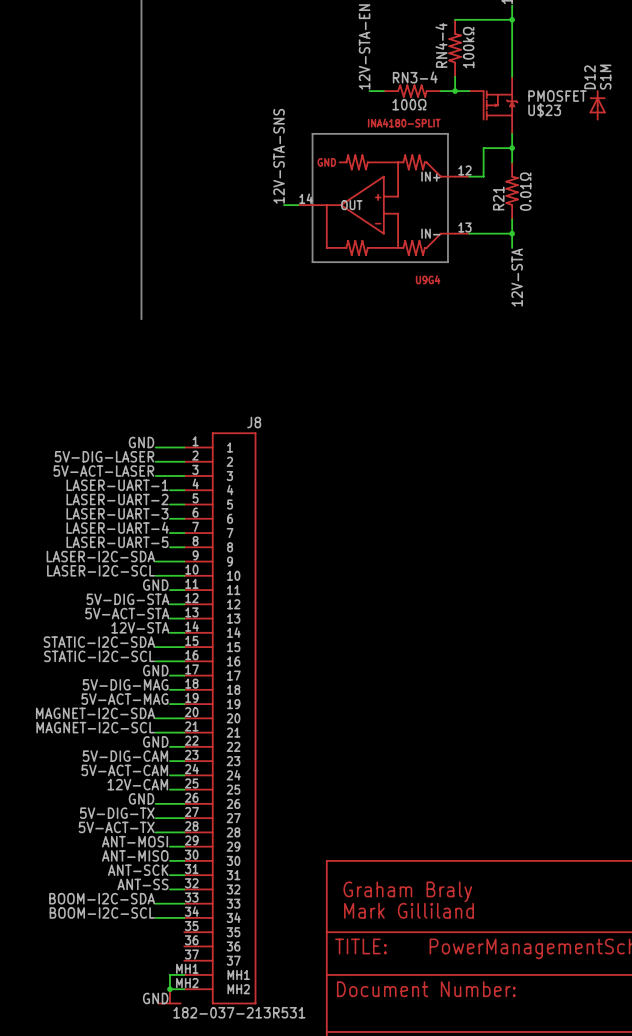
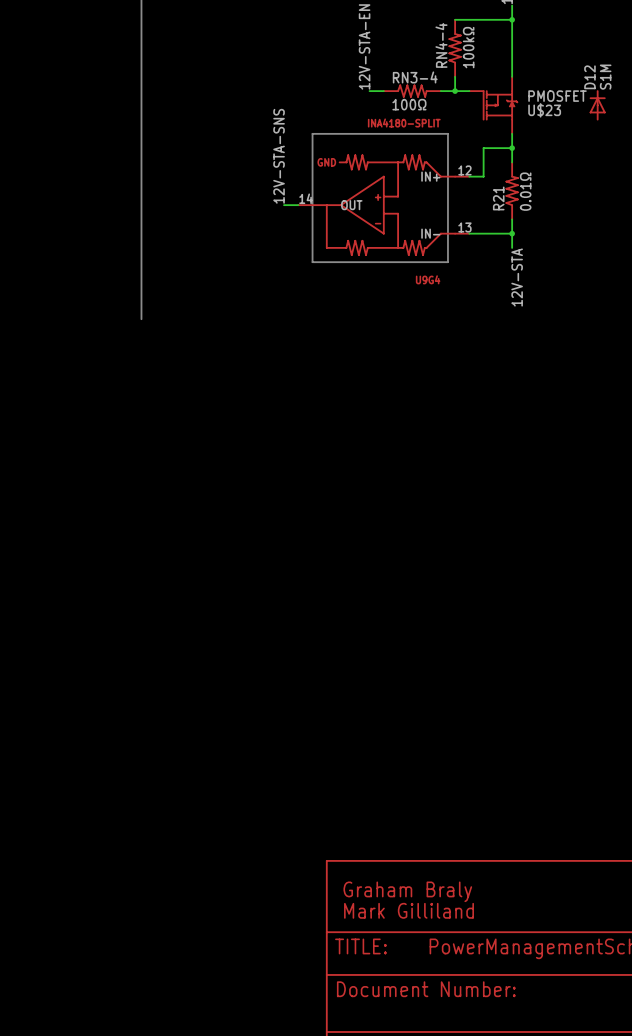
label: GND (141, 442) -> none
wire: (155, 447) (184, 447) -> none
label: 5V-DIG-LASER (104, 456) -> none
wire: (155, 461) (184, 461) -> none
label: 5V-ACT-LASER (103, 471) -> none
wire: (155, 476) (184, 476) -> none
label: LASER-UART-1 (117, 485) -> none
wire: (169, 490) (184, 490) -> none
label: LASER-UART-2 (117, 499) -> none
wire: (169, 504) (184, 504) -> none
label: LASER-UART-3 (117, 513) -> none
wire: (169, 518) (184, 518) -> none
label: LASER-UART-4 (117, 527) -> none
wire: (169, 533) (184, 533) -> none
label: LASER-UART-5 (117, 542) -> none
wire: (169, 547) (184, 547) -> none
label: LASER-I2C-SDA (100, 556) -> none
wire: (155, 561) (184, 561) -> none
label: LASER-I2C-SCL (101, 570) -> none
wire: (155, 575) (184, 575) -> none
label: GND (155, 585) -> none
wire: (169, 590) (184, 590) -> none
label: 5V-DIG-STA (127, 599) -> none
wire: (169, 604) (184, 604) -> none
label: 5V-ACT-STA (127, 613) -> none
wire: (169, 618) (184, 618) -> none
label: 12V-STA (140, 627) -> none
wire: (169, 632) (184, 632) -> none
label: STATIC-I2C-SDA (99, 642) -> none
wire: (155, 647) (184, 647) -> none
label: STATIC-I2C-SCL (99, 656) -> none
wire: (155, 661) (184, 661) -> none
label: GND (155, 670) -> none
wire: (169, 675) (184, 675) -> none
label: 5V-DIG-MAG (125, 684) -> none
wire: (169, 689) (184, 689) -> none
label: 5V-ACT-MAG (124, 699) -> none
wire: (169, 704) (184, 704) -> none
label: MAGNET-I2C-SDA (95, 713) -> none
wire: (155, 718) (184, 718) -> none
J8: 182-037-213R531 (220, 718) -> none
label: MAGNET-I2C-SCL (95, 727) -> none
wire: (155, 732) (184, 732) -> none
label: GND (155, 741) -> none
wire: (169, 746) (184, 746) -> none
label: 5V-DIG-CAM (125, 756) -> none
wire: (169, 761) (184, 761) -> none
label: 5V-ACT-CAM (124, 770) -> none
wire: (169, 775) (184, 775) -> none
label: 12V-CAM (137, 784) -> none
wire: (169, 789) (184, 789) -> none
label: GND (141, 798) -> none
wire: (155, 803) (184, 803) -> none
label: 5V-DIG-TX (117, 813) -> none
wire: (155, 818) (184, 818) -> none
label: 5V-ACT-TX (116, 827) -> none
wire: (155, 832) (184, 832) -> none
label: ANT-MOSI (135, 841) -> none
wire: (169, 846) (184, 846) -> none
label: ANT-MISO (135, 855) -> none
wire: (169, 860) (184, 860) -> none
label: ANT-SCK (138, 870) -> none
wire: (169, 875) (184, 875) -> none
label: ANT-SS (142, 884) -> none
wire: (169, 889) (184, 889) -> none
label: BOOM-I2C-SDA (102, 898) -> none
wire: (155, 903) (184, 903) -> none
label: BOOM-I2C-SCL (102, 912) -> none
wire: (155, 917) (184, 917) -> none
wire: (184, 974) (169, 974) (169, 989) (184, 989) -> none
junction: (169, 989) -> none
power symbol: GND (169, 996) -> none

